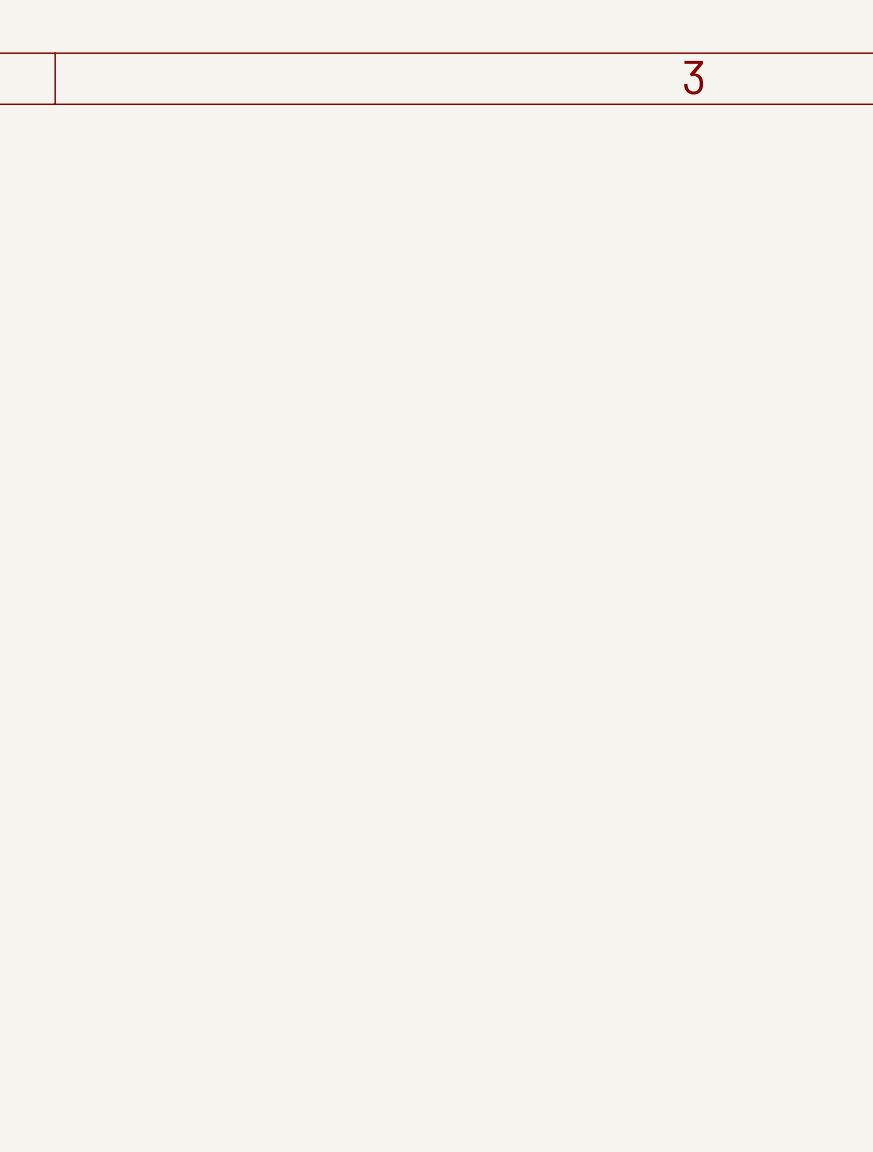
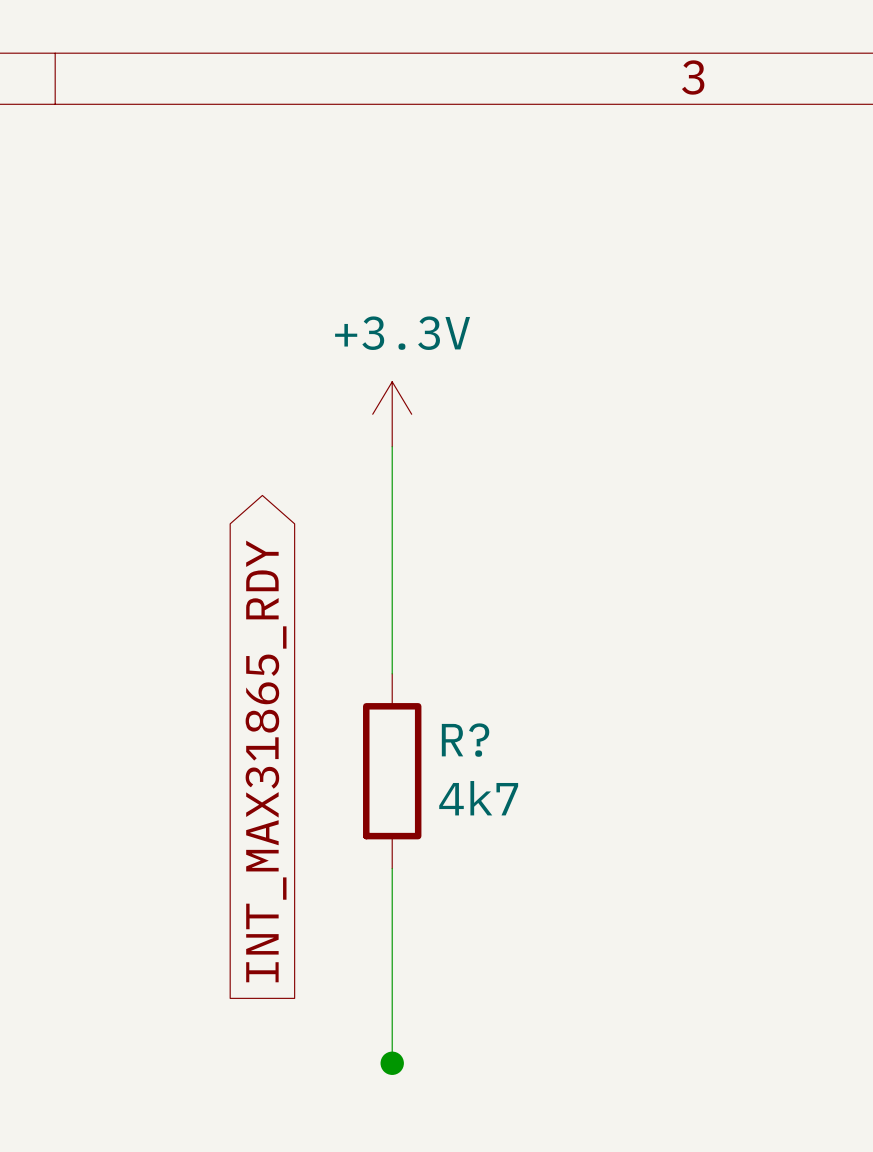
power symbol: none -> +3.3V (392, 414)
wire: none -> (392, 446) (392, 673)
R?: none -> 4k7 (392, 771)
global label: none -> INT_MAX31865_RDY (266, 761)
wire: none -> (392, 868) (392, 1063)
junction: none -> (392, 1063)

